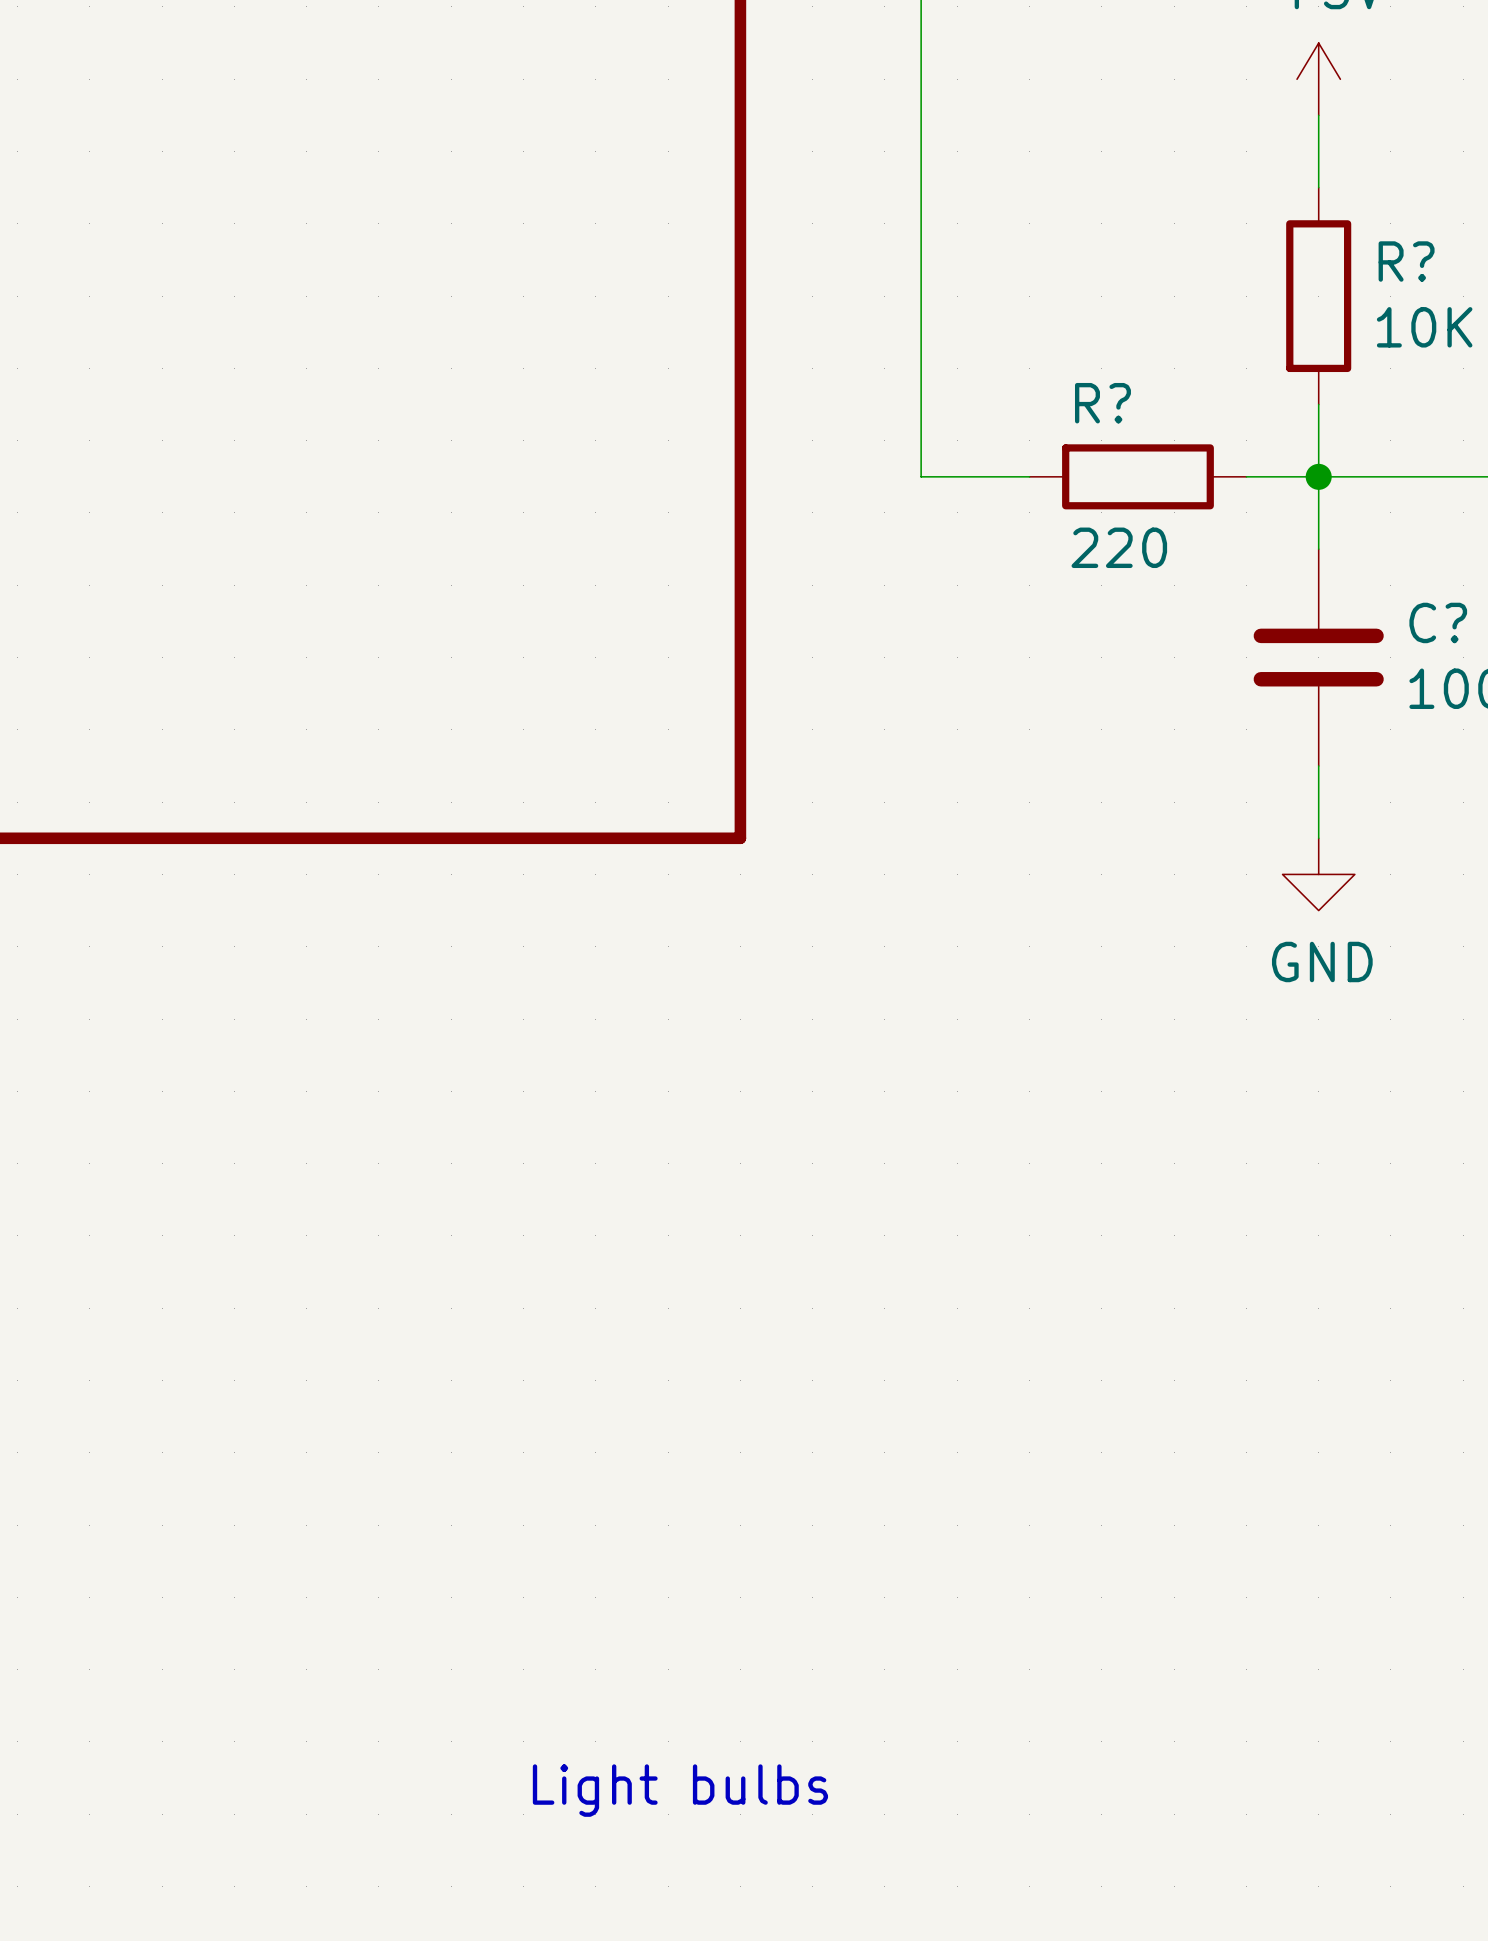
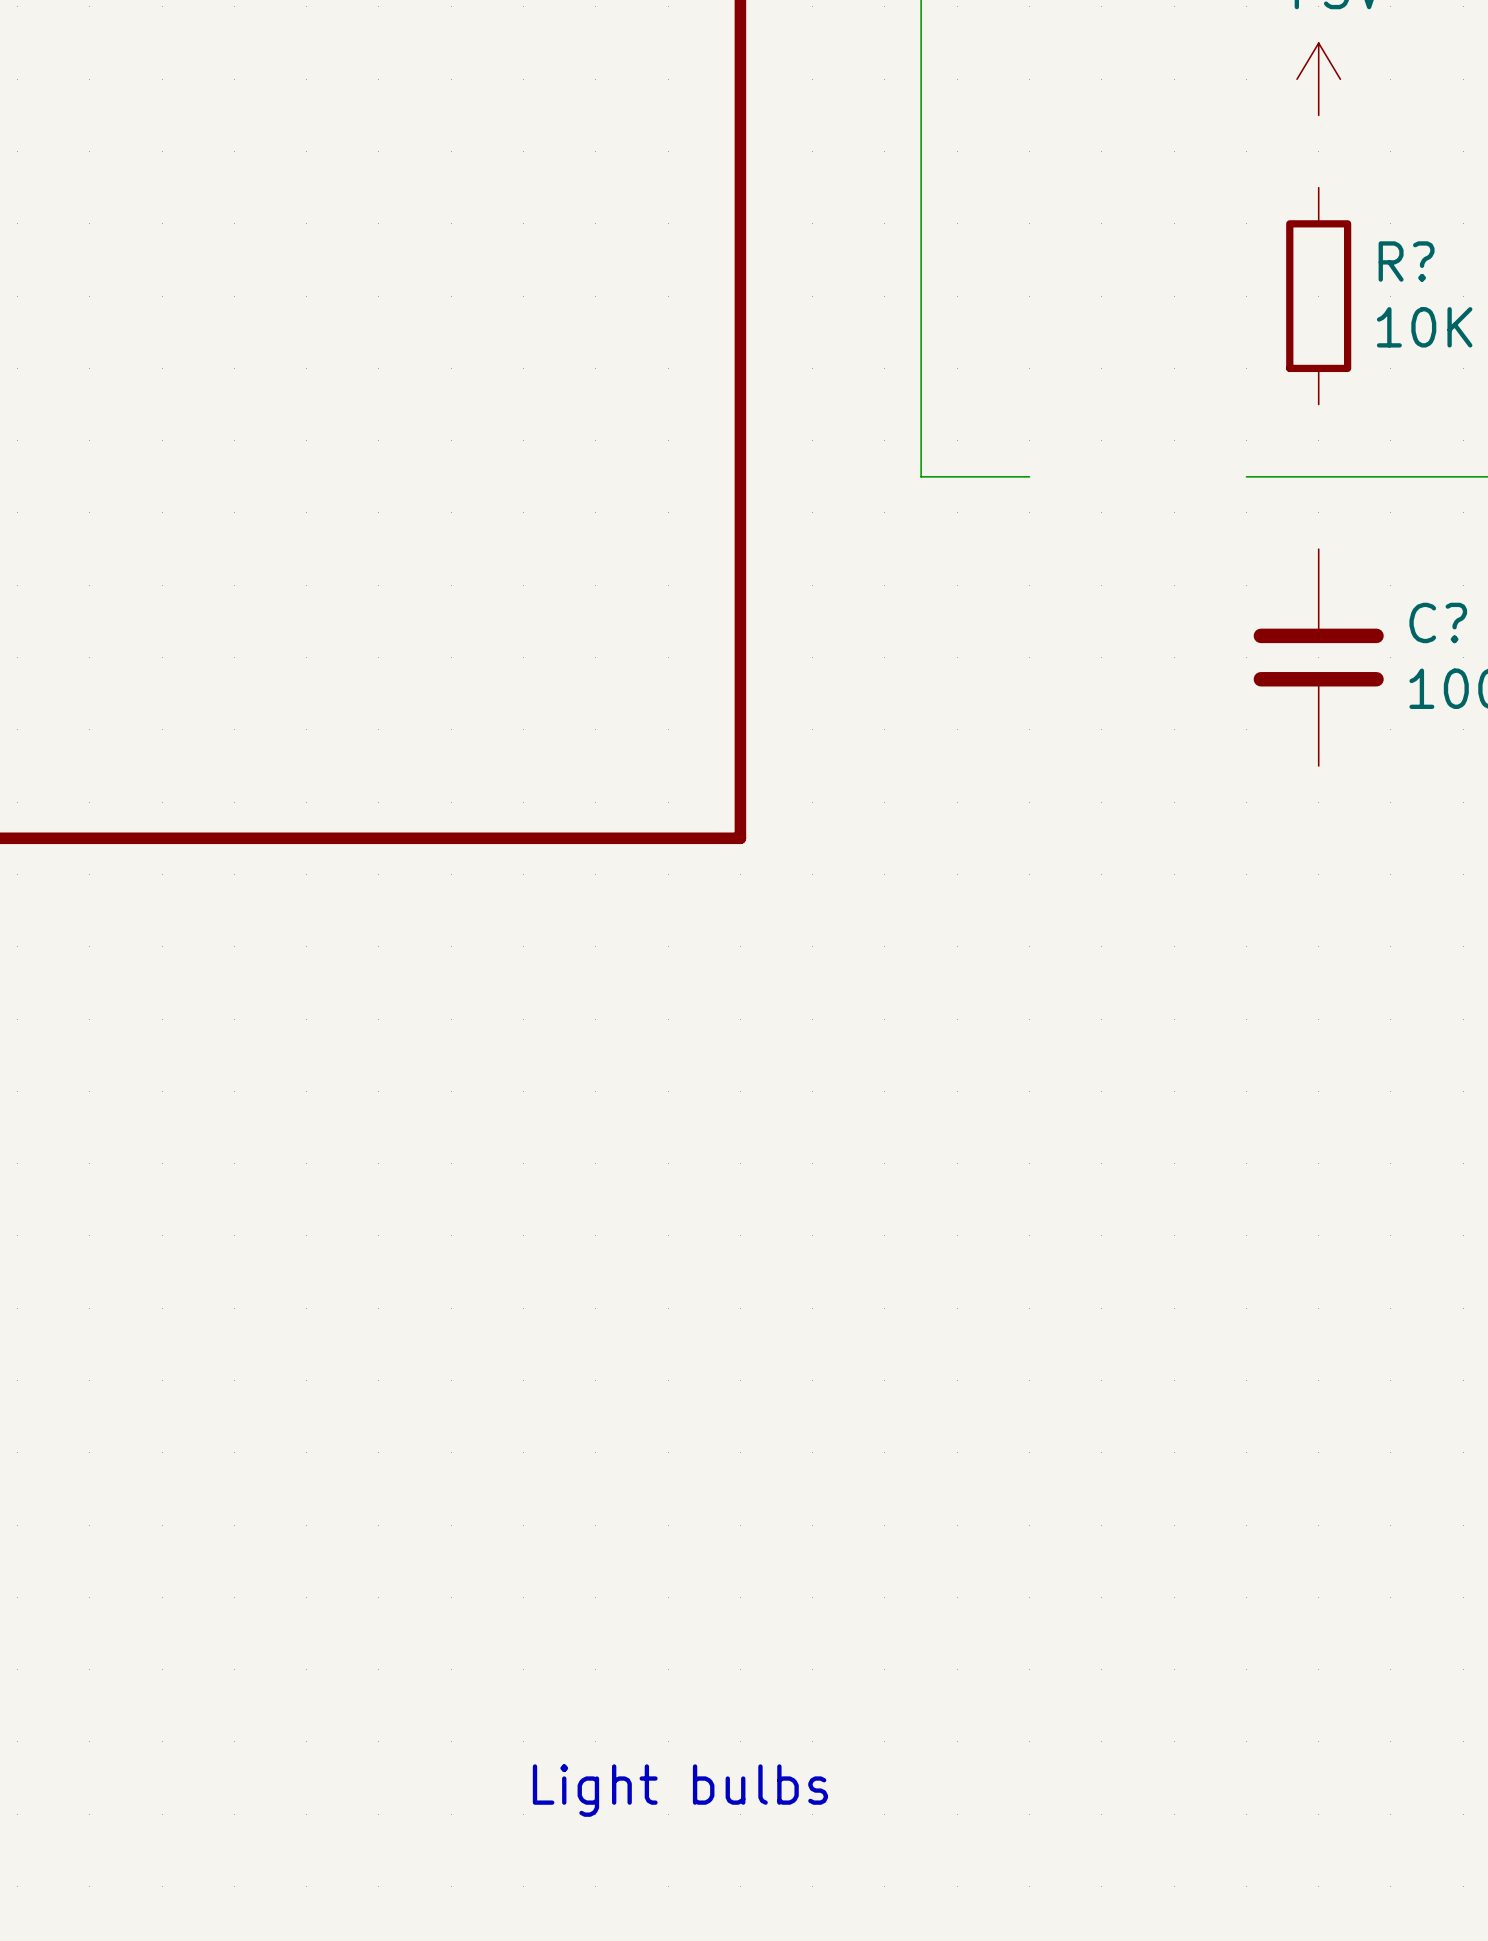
wire: (1318, 115) (1318, 187) -> none
wire: (1318, 404) (1318, 549) -> none
R?: 220 (1137, 476) -> none
junction: (1318, 476) -> none
wire: (1318, 765) (1318, 838) -> none
power symbol: GND (1318, 874) -> none

